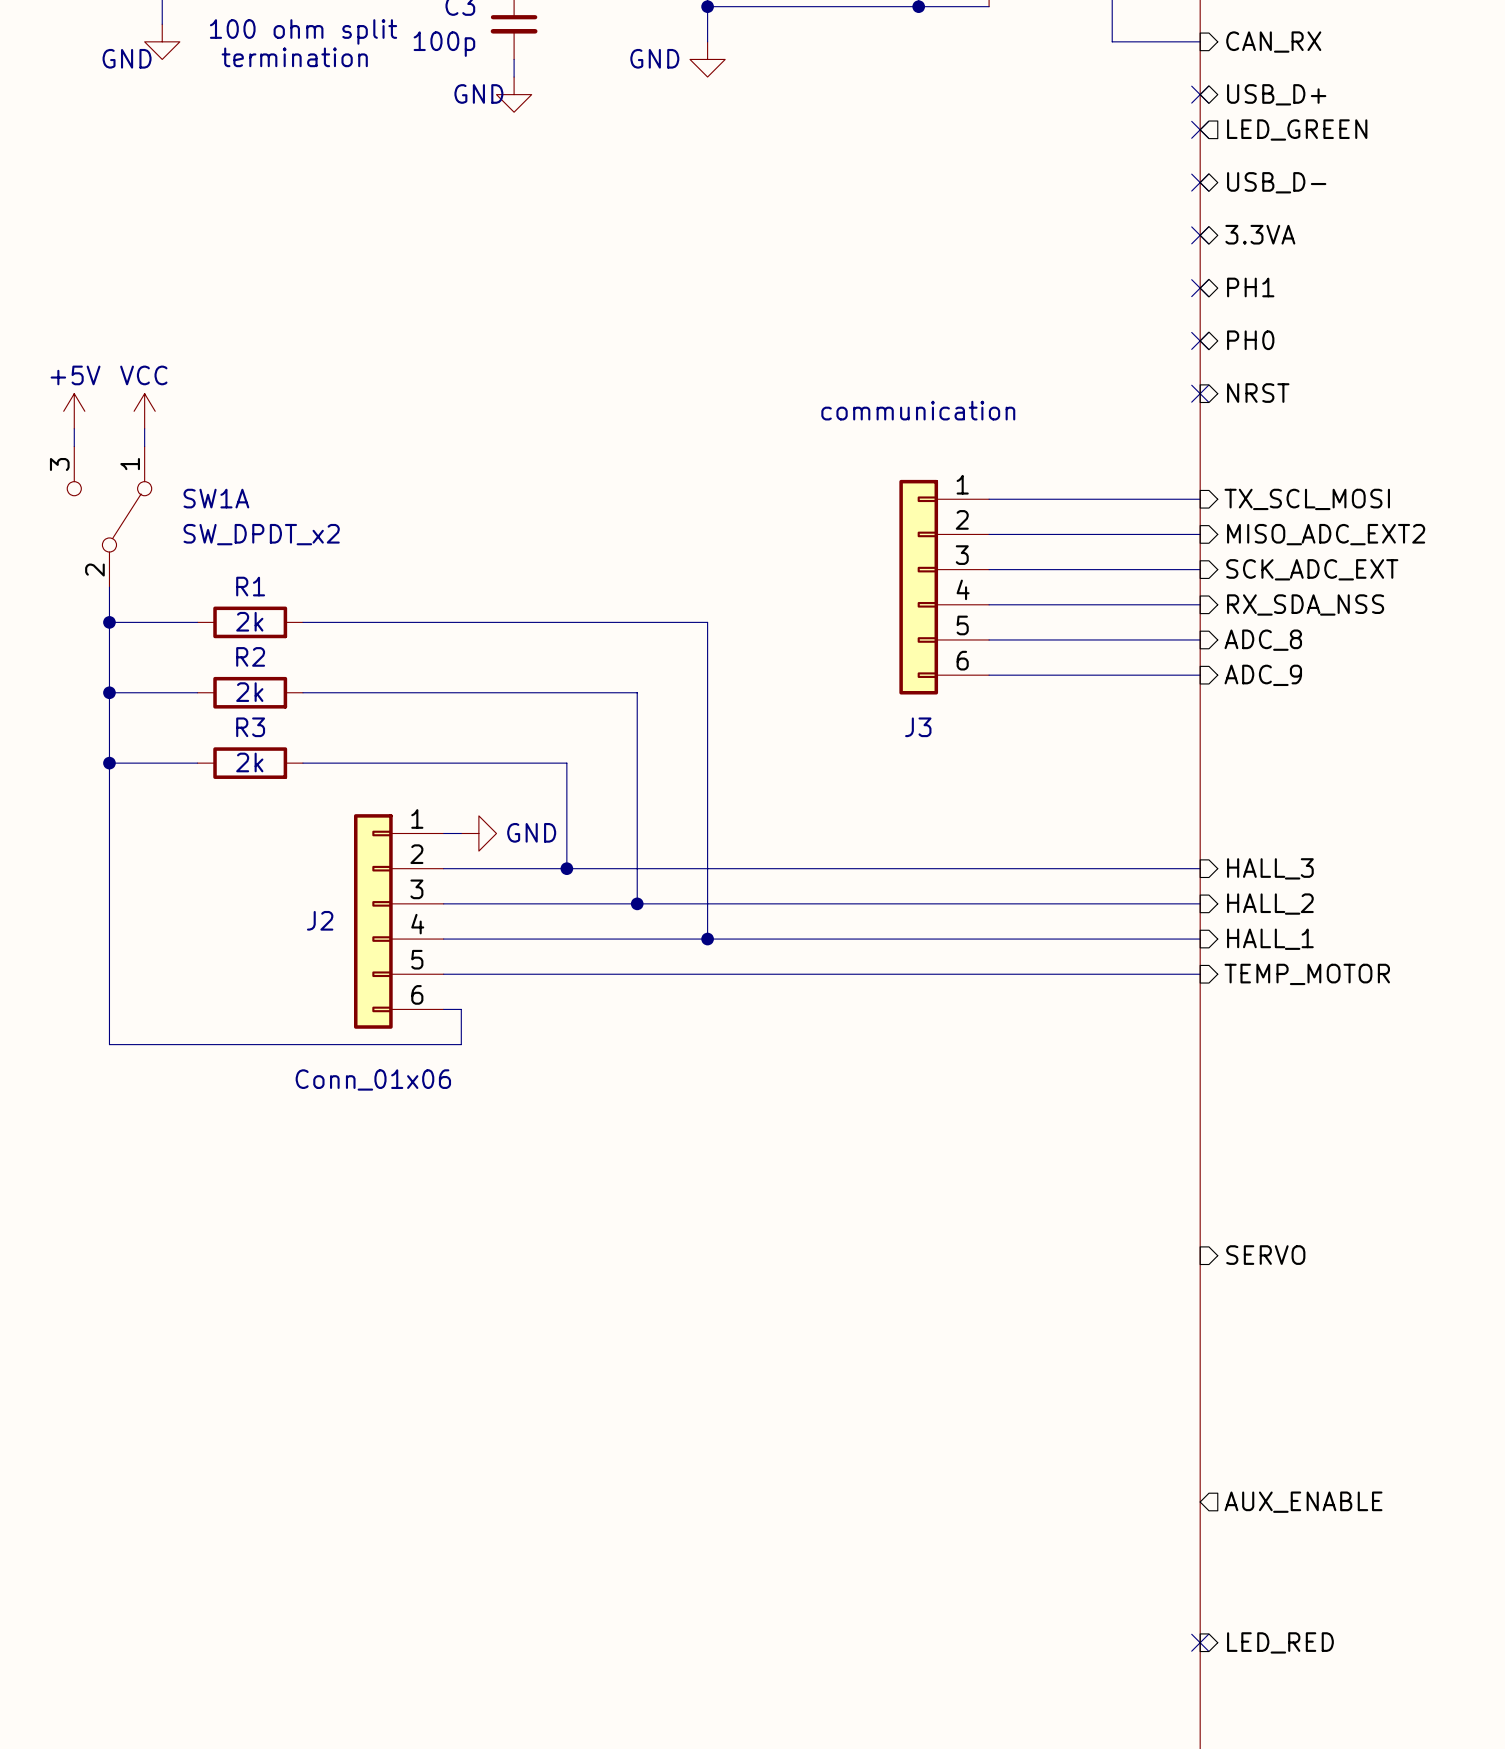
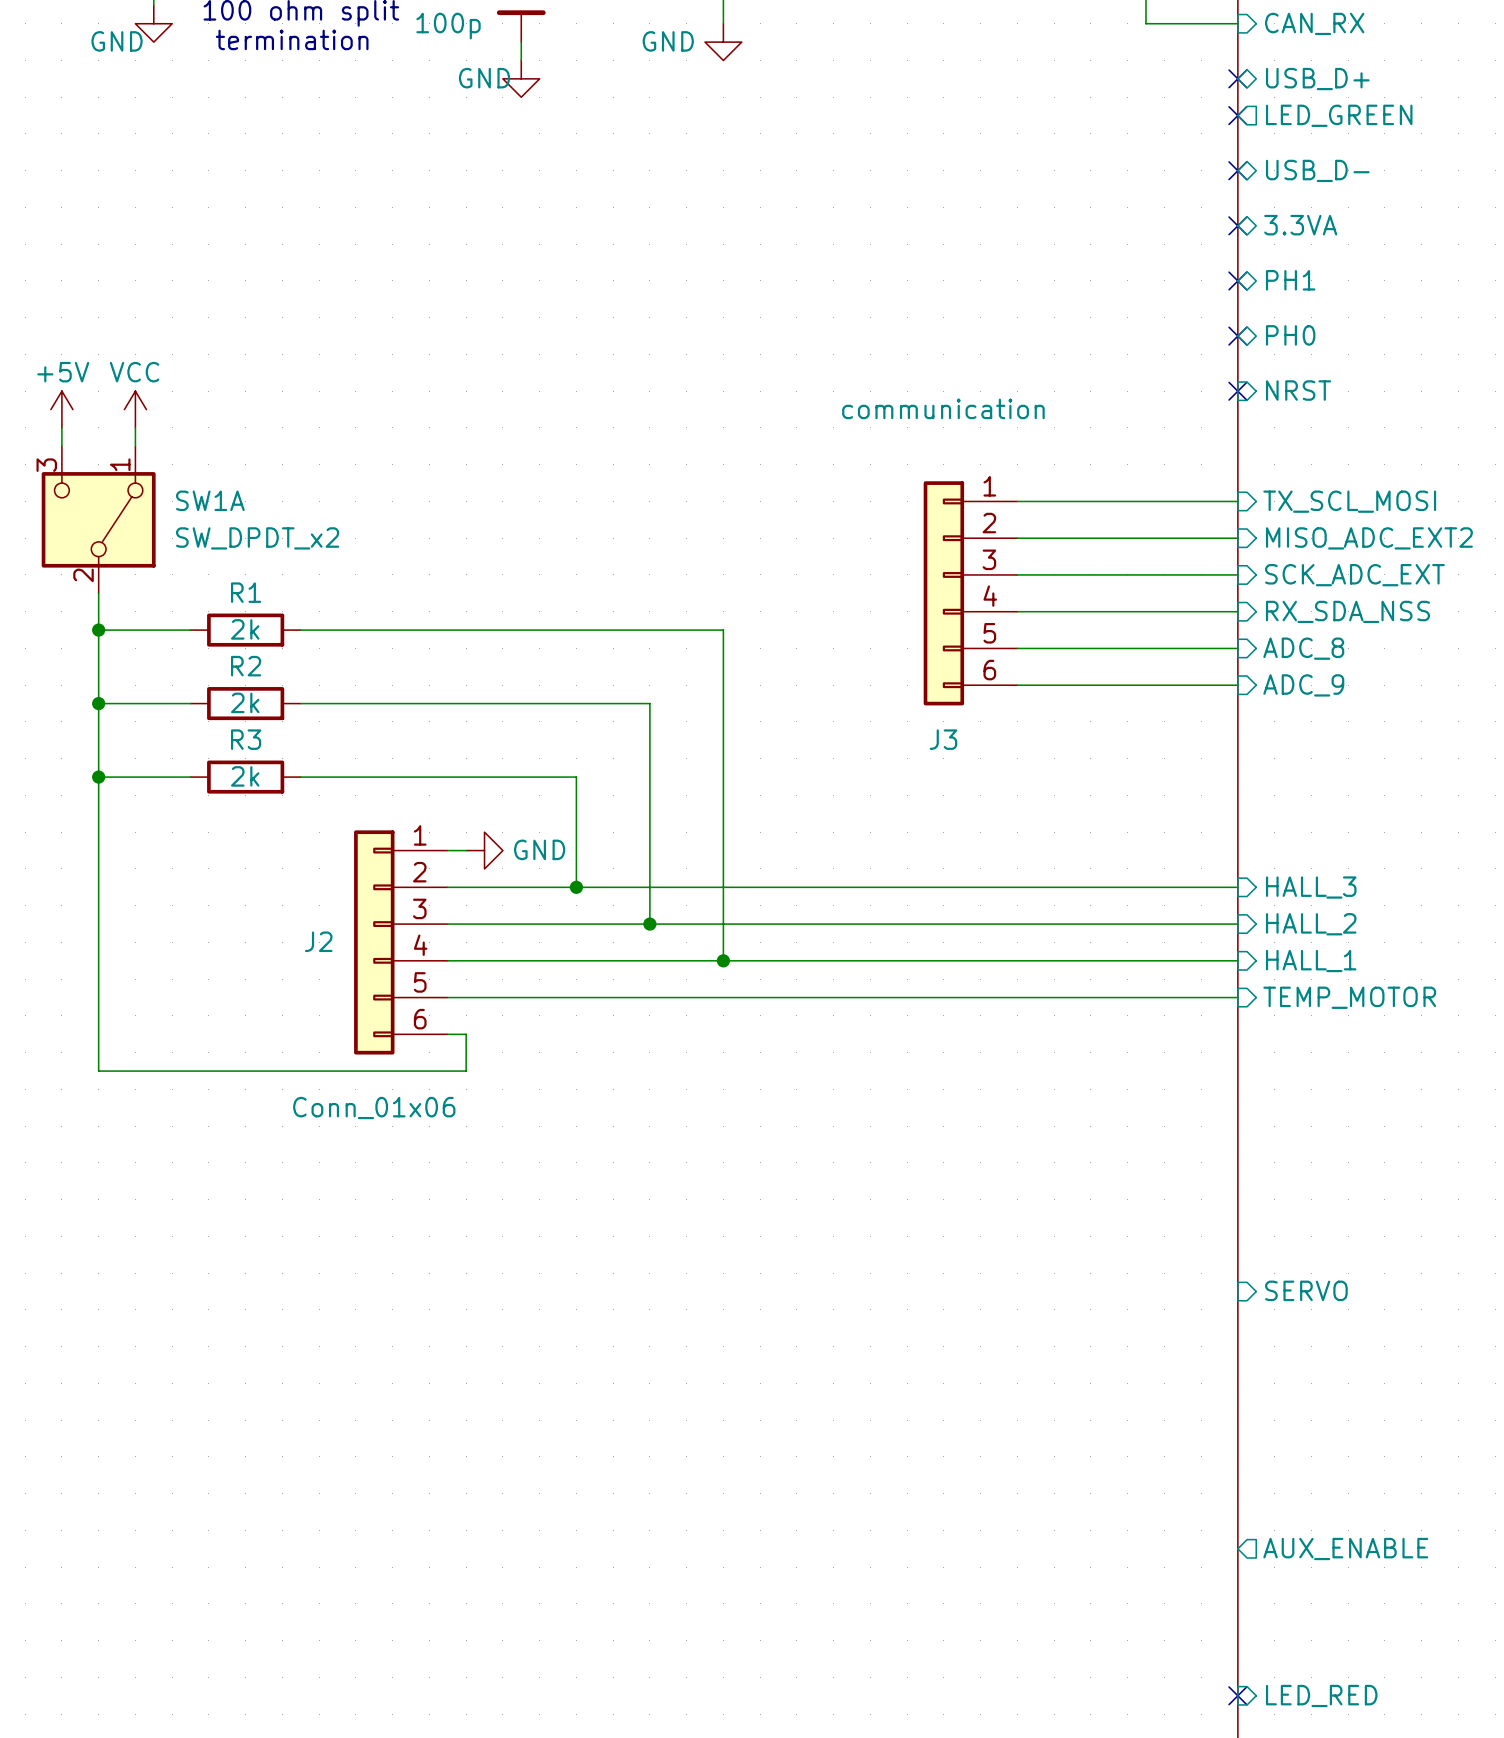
SW1A symbol: [67, 446, 152, 588] -> [41, 446, 156, 594]

